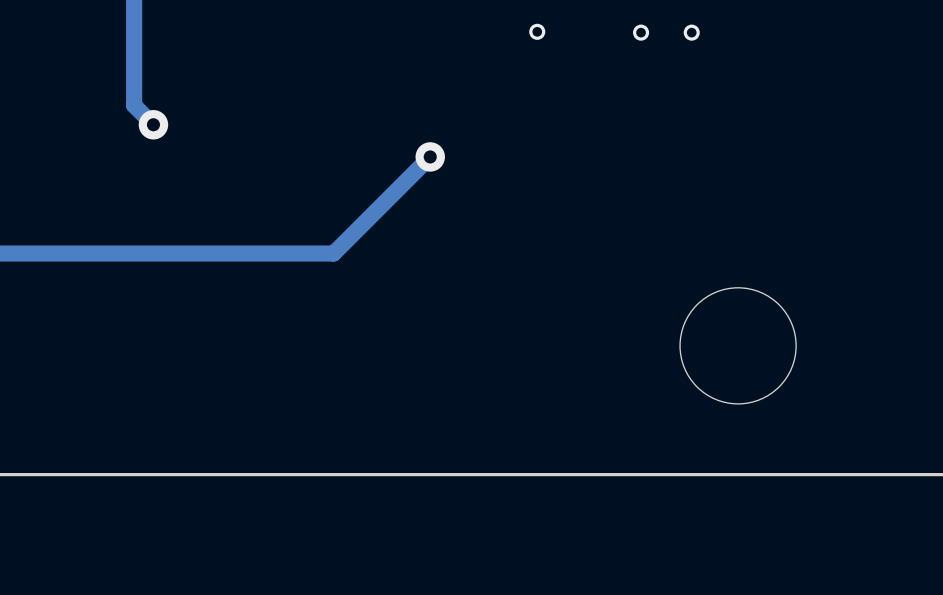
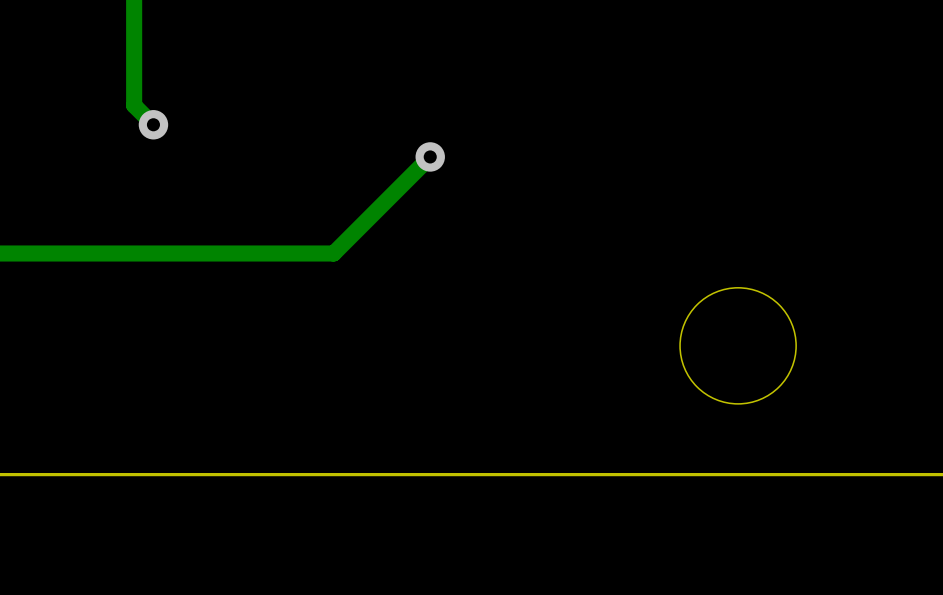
via: (537, 31) -> none
via: (641, 32) -> none
via: (691, 32) -> none

